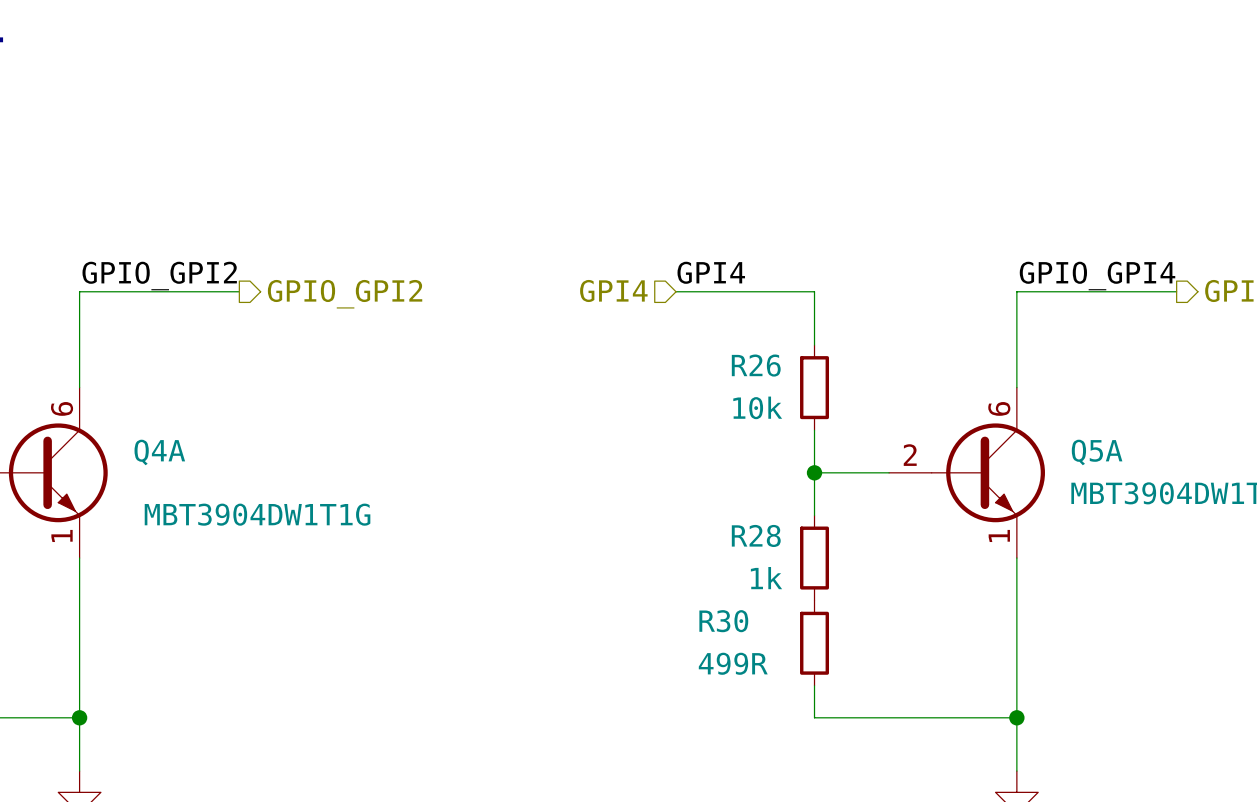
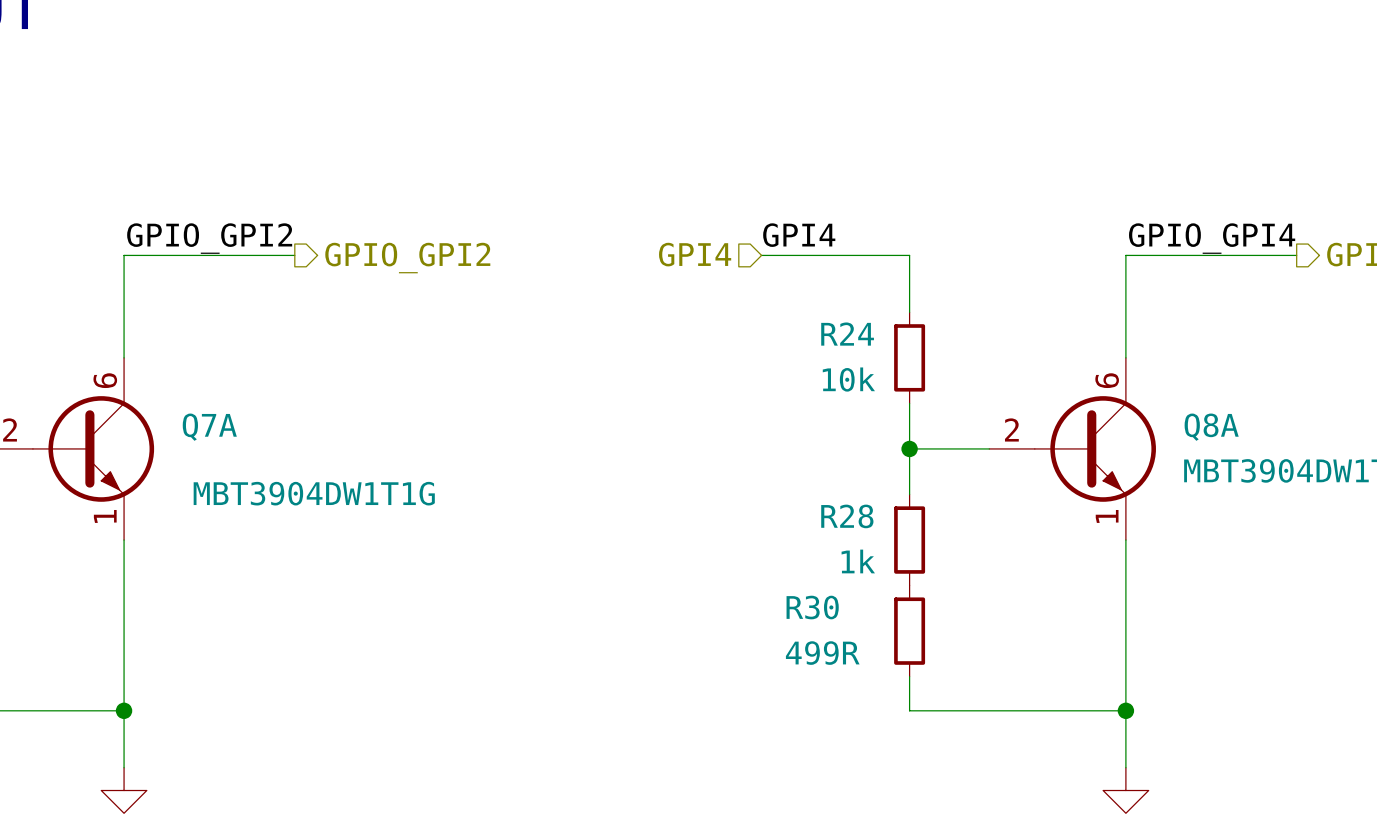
R26 name: R26 (756, 365) -> R24 (847, 334)
Q4A name: Q4A (159, 452) -> Q7A (209, 427)
Q5A name: Q5A (1097, 452) -> Q8A (1211, 427)

